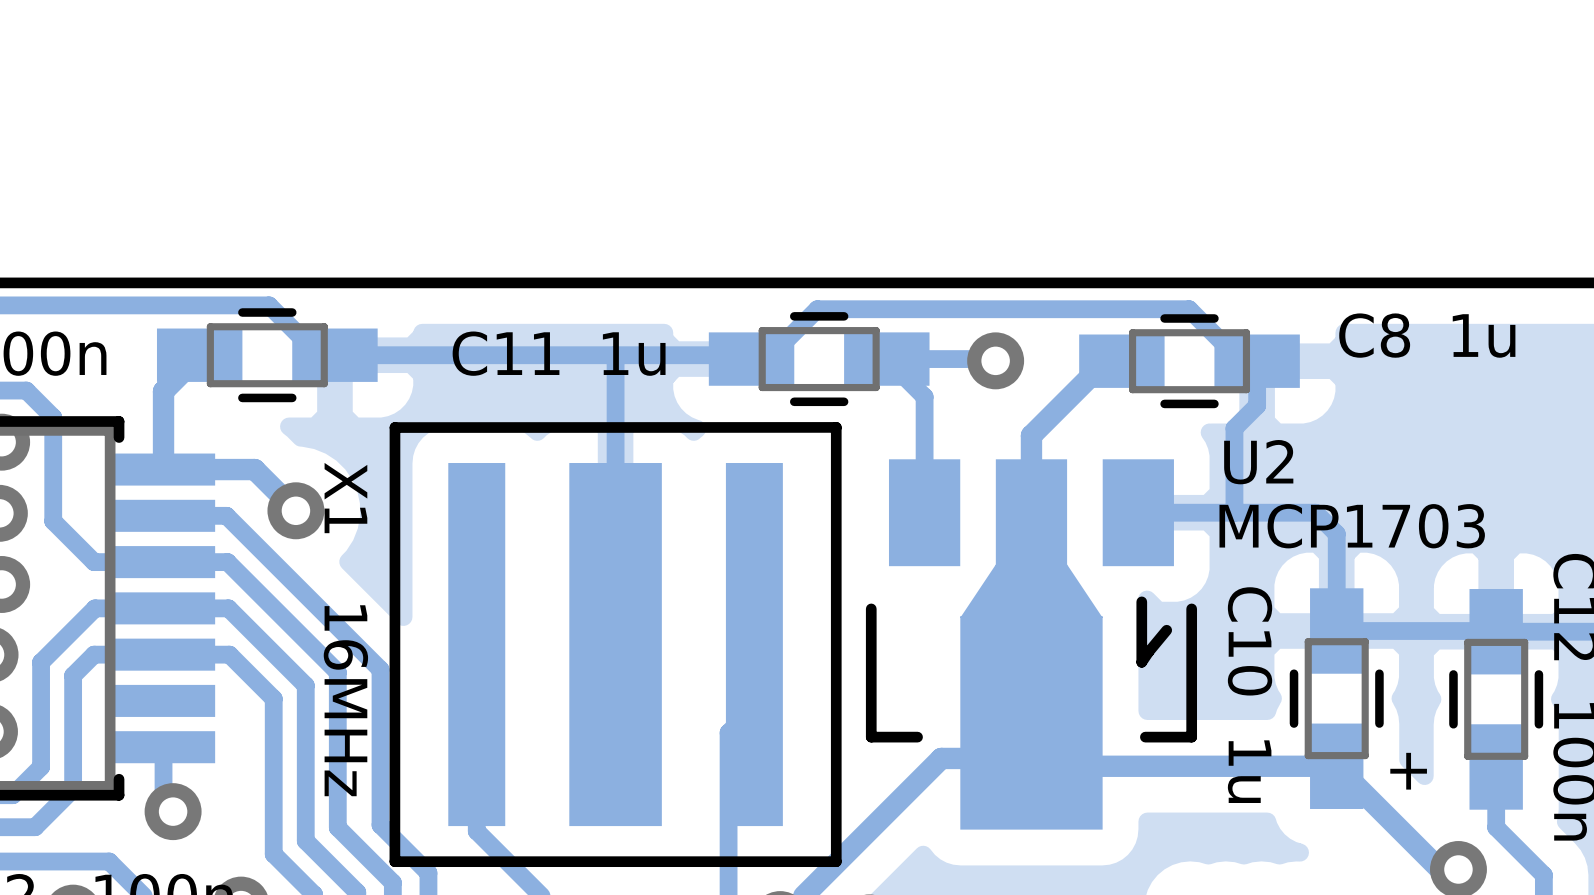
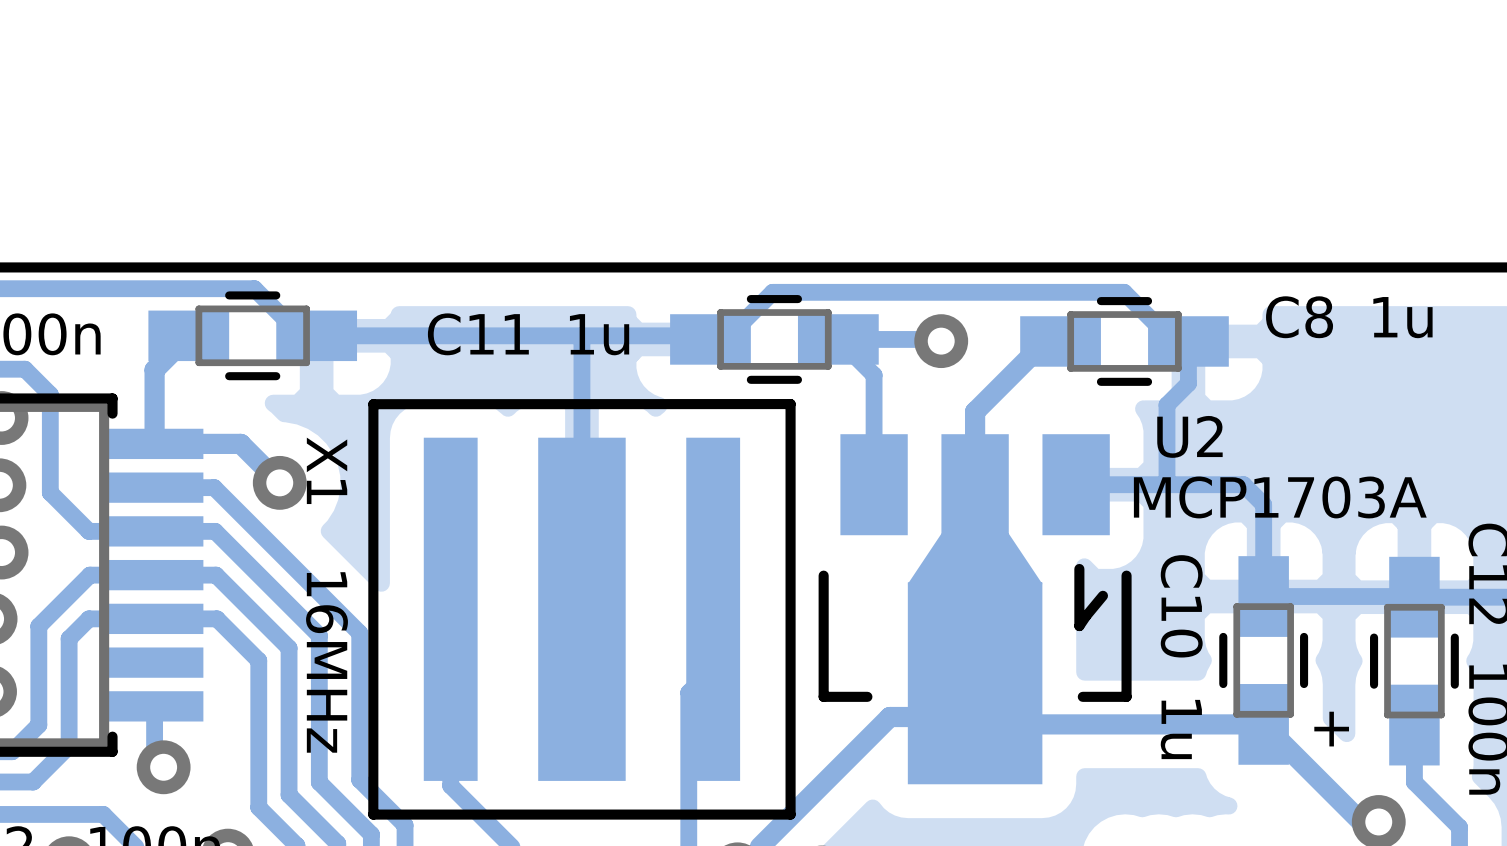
U2 value: MCP1703 (1352, 526) -> MCP1703A (1280, 497)

